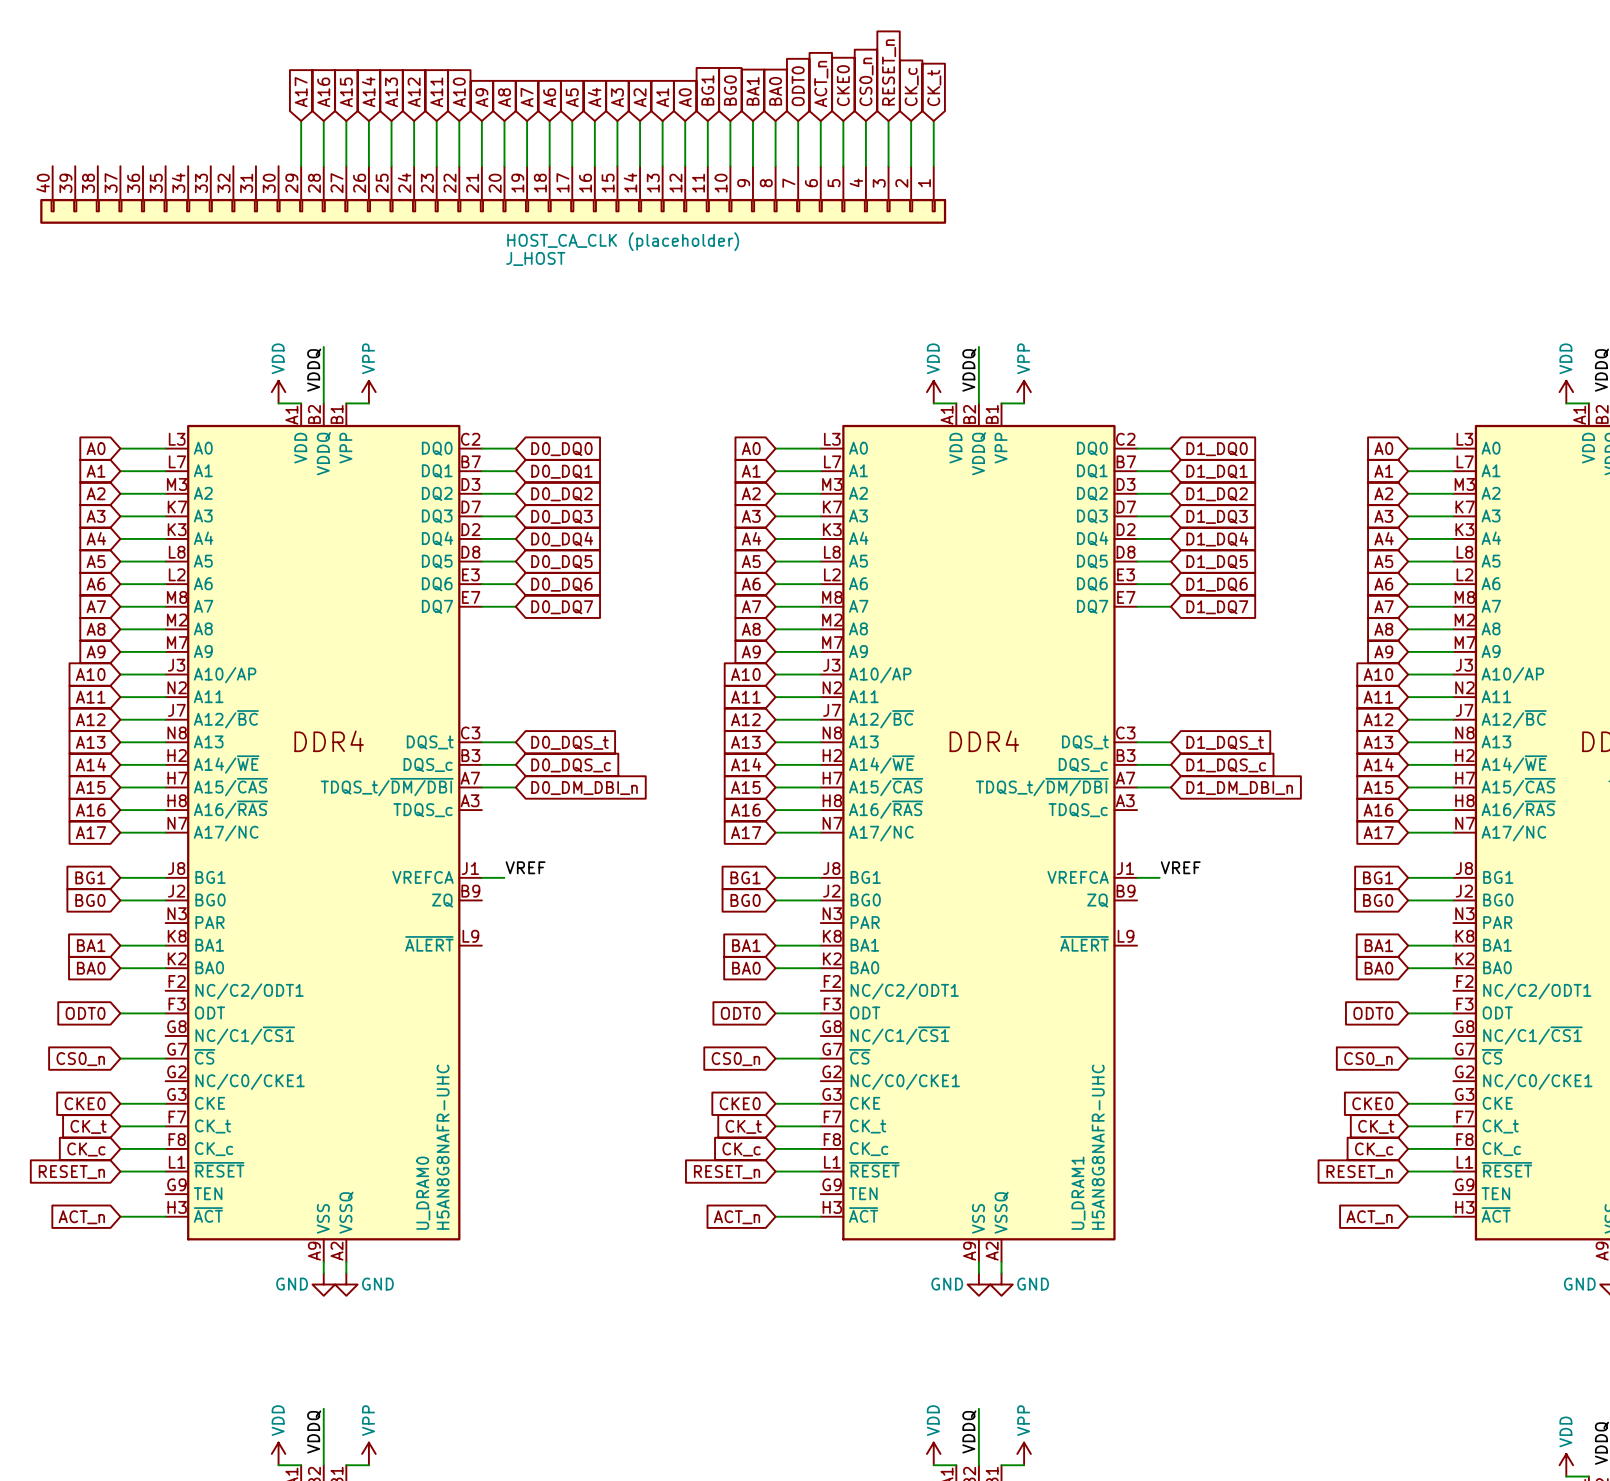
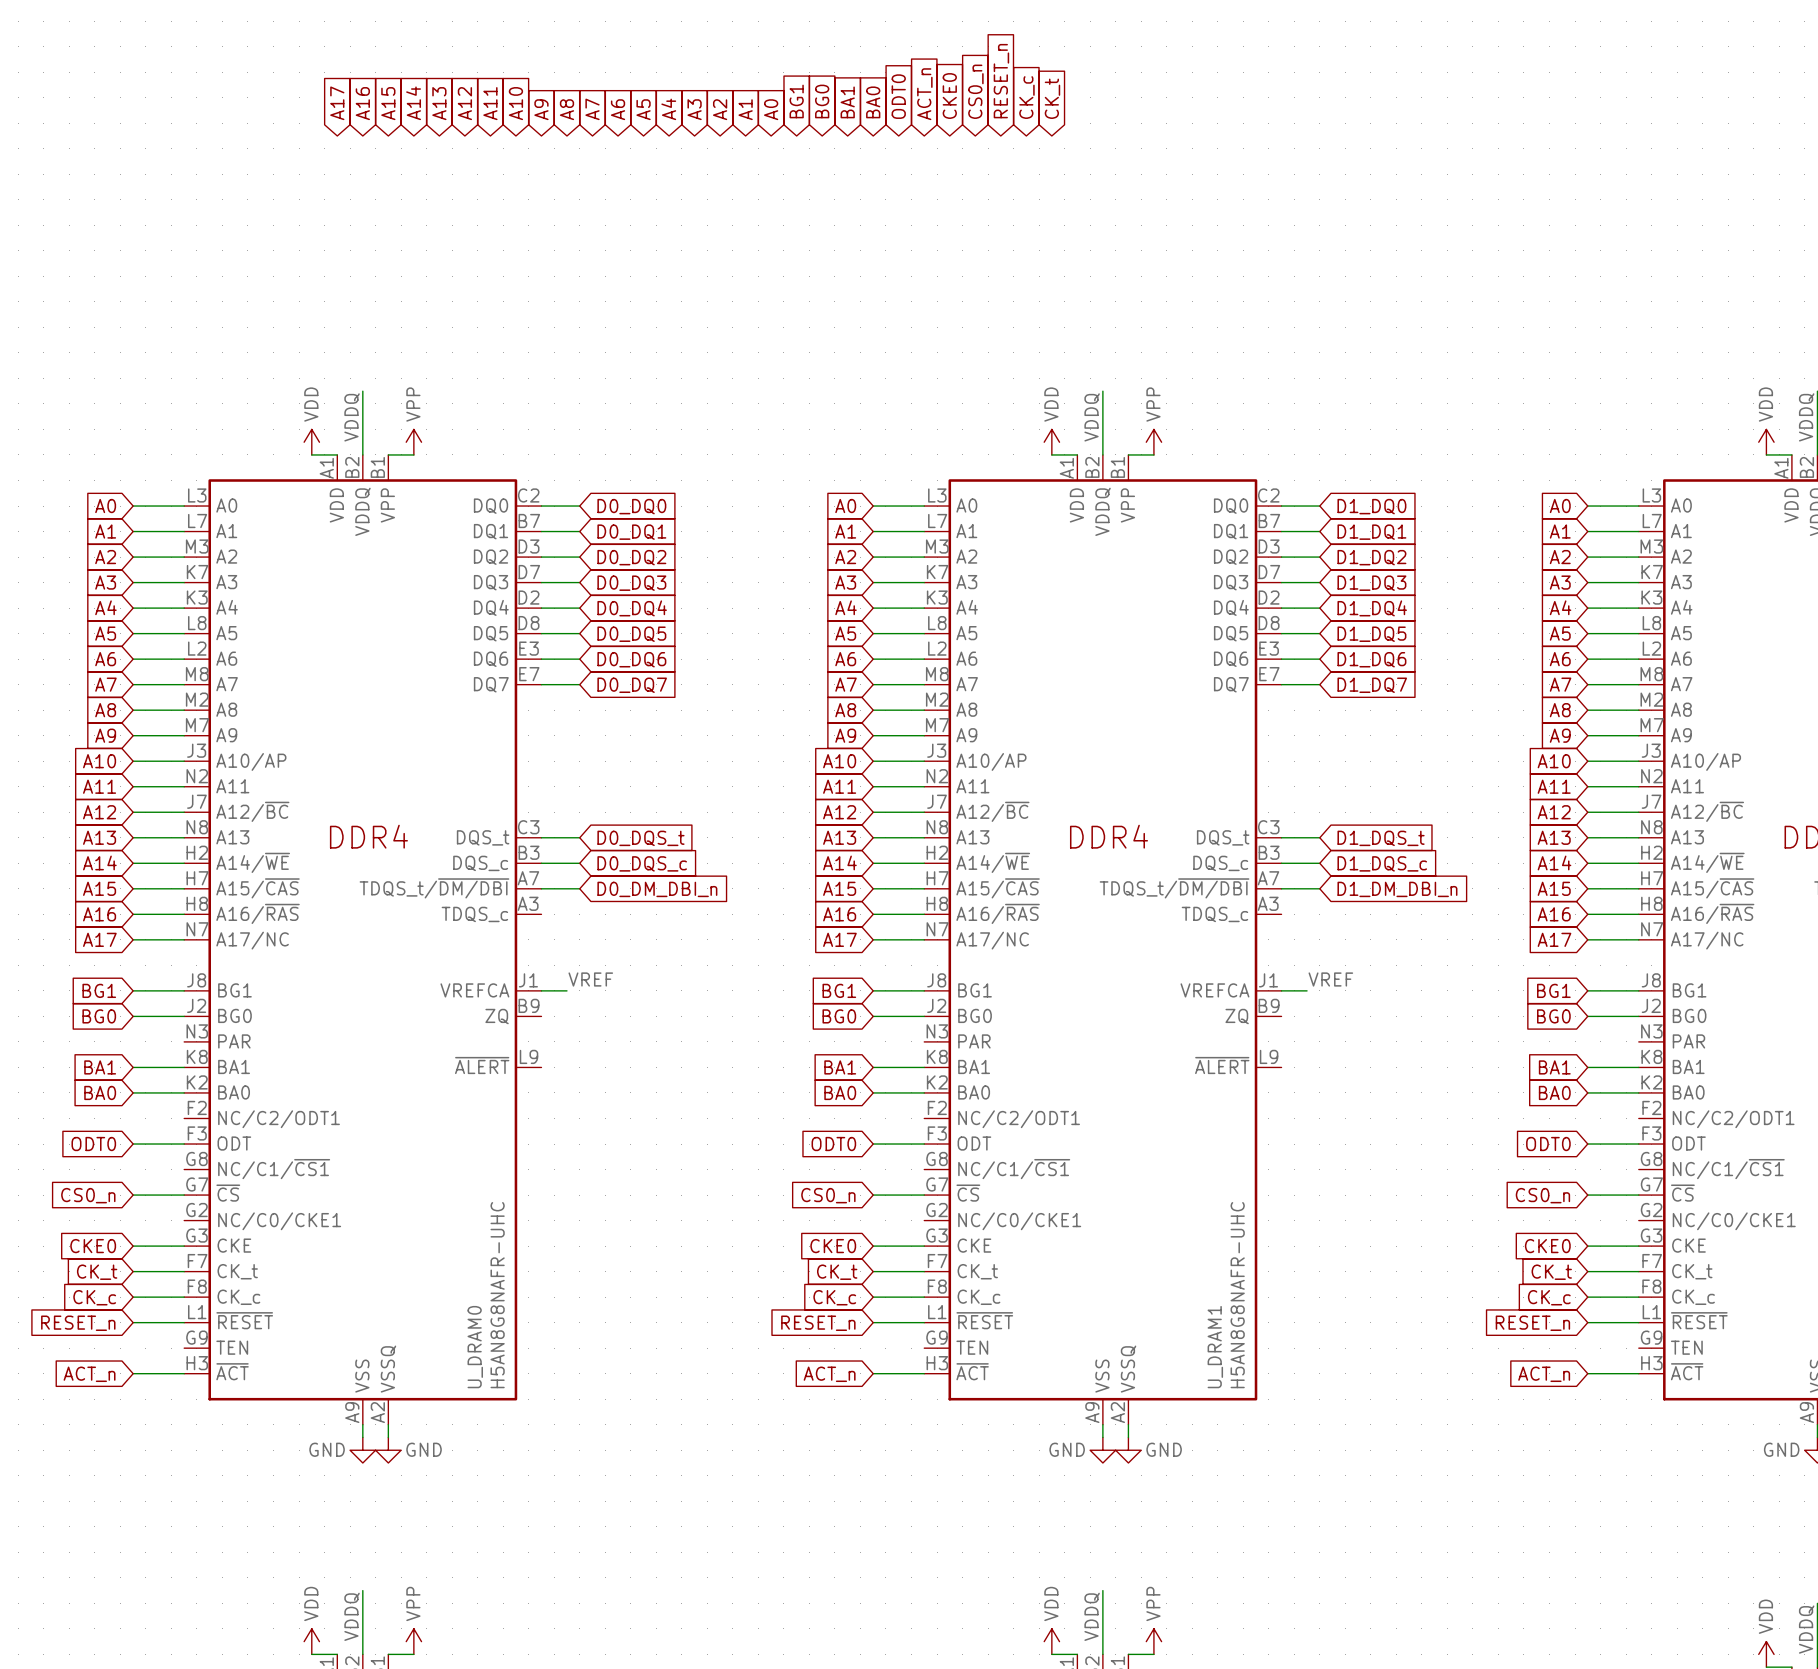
wire: (301, 121) (301, 166) -> none
wire: (323, 121) (323, 166) -> none
wire: (346, 121) (346, 166) -> none
wire: (368, 121) (368, 166) -> none
wire: (391, 121) (391, 166) -> none
wire: (414, 121) (414, 166) -> none
wire: (436, 121) (436, 166) -> none
wire: (459, 121) (459, 166) -> none
wire: (481, 121) (481, 166) -> none
wire: (504, 121) (504, 166) -> none
wire: (527, 121) (527, 166) -> none
wire: (549, 121) (549, 166) -> none
wire: (572, 121) (572, 166) -> none
wire: (594, 121) (594, 166) -> none
wire: (617, 121) (617, 166) -> none
wire: (640, 121) (640, 166) -> none
wire: (662, 121) (662, 166) -> none
wire: (685, 121) (685, 166) -> none
wire: (707, 121) (707, 166) -> none
wire: (730, 121) (730, 166) -> none
wire: (752, 121) (752, 166) -> none
wire: (775, 121) (775, 166) -> none
wire: (798, 121) (798, 166) -> none
wire: (820, 121) (820, 166) -> none
wire: (843, 121) (843, 166) -> none
wire: (865, 121) (865, 166) -> none
wire: (888, 121) (888, 166) -> none
wire: (911, 121) (911, 166) -> none
wire: (933, 121) (933, 166) -> none
J_HOST: HOST_CA_CLK (placeholder) (493, 195) -> none

